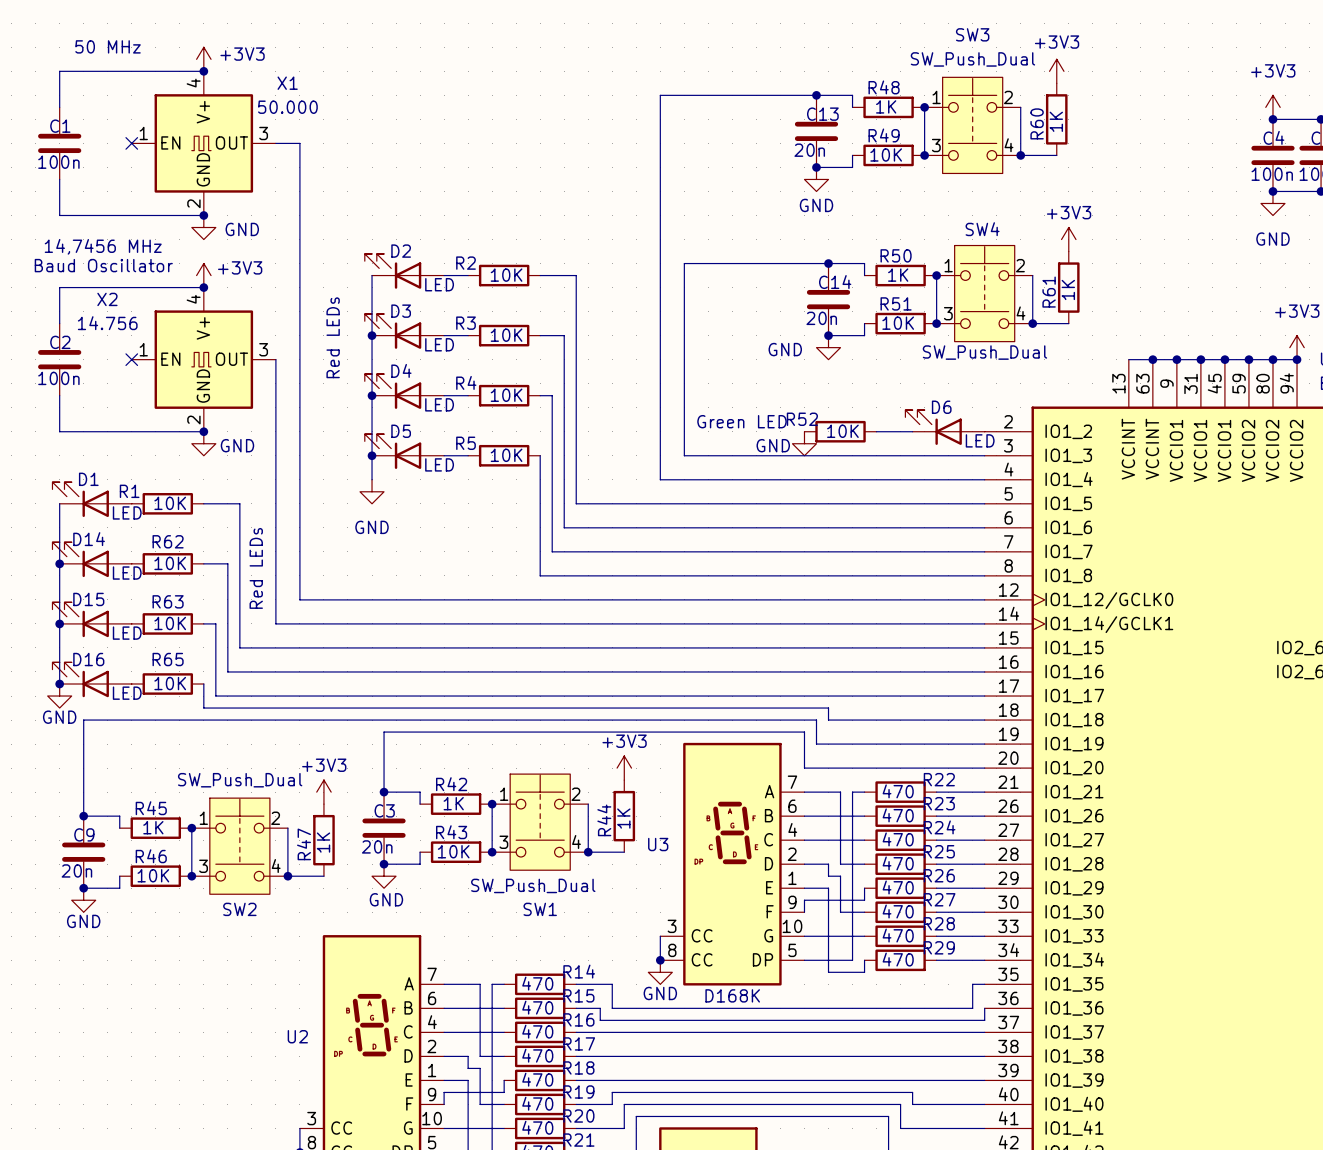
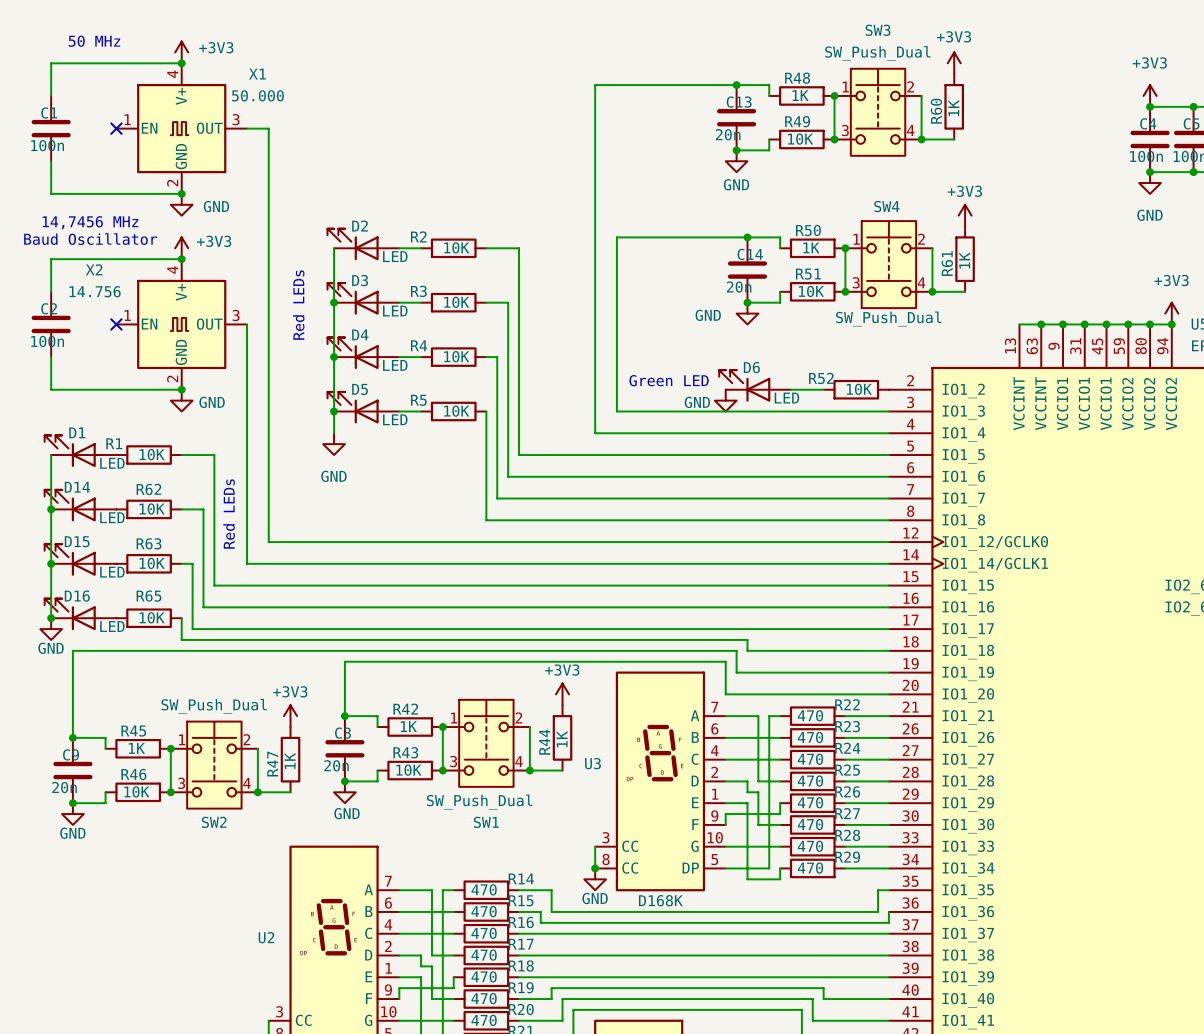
D6 position: (945, 427) -> (755, 385)
R52 position: (840, 431) -> (856, 389)

